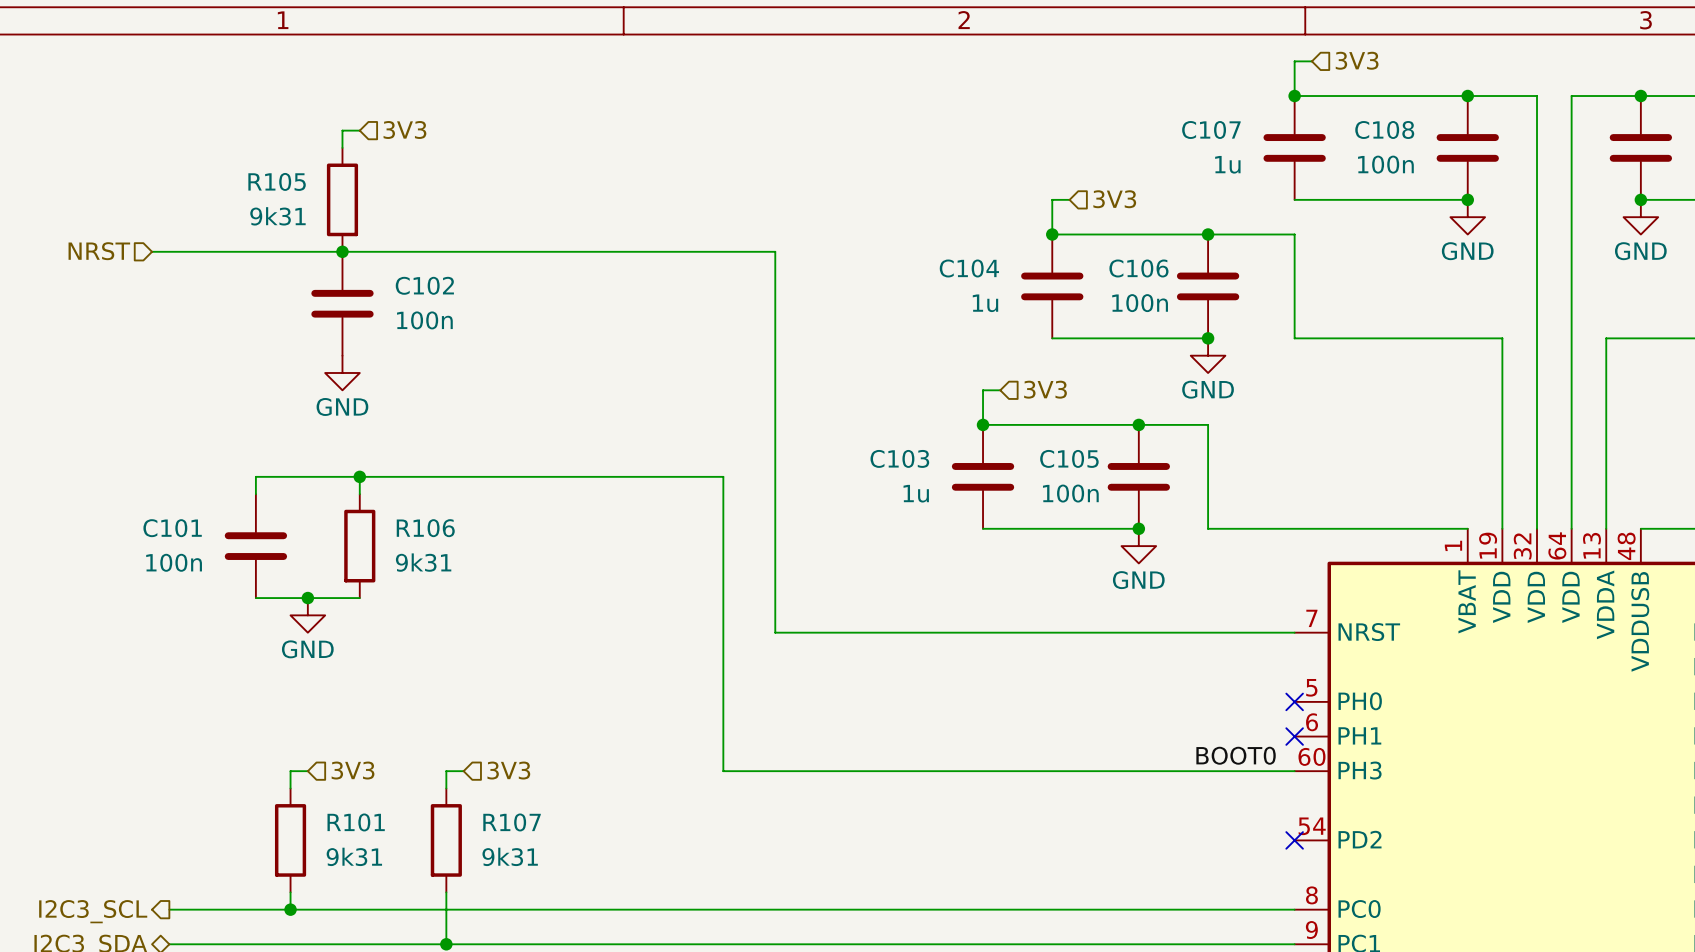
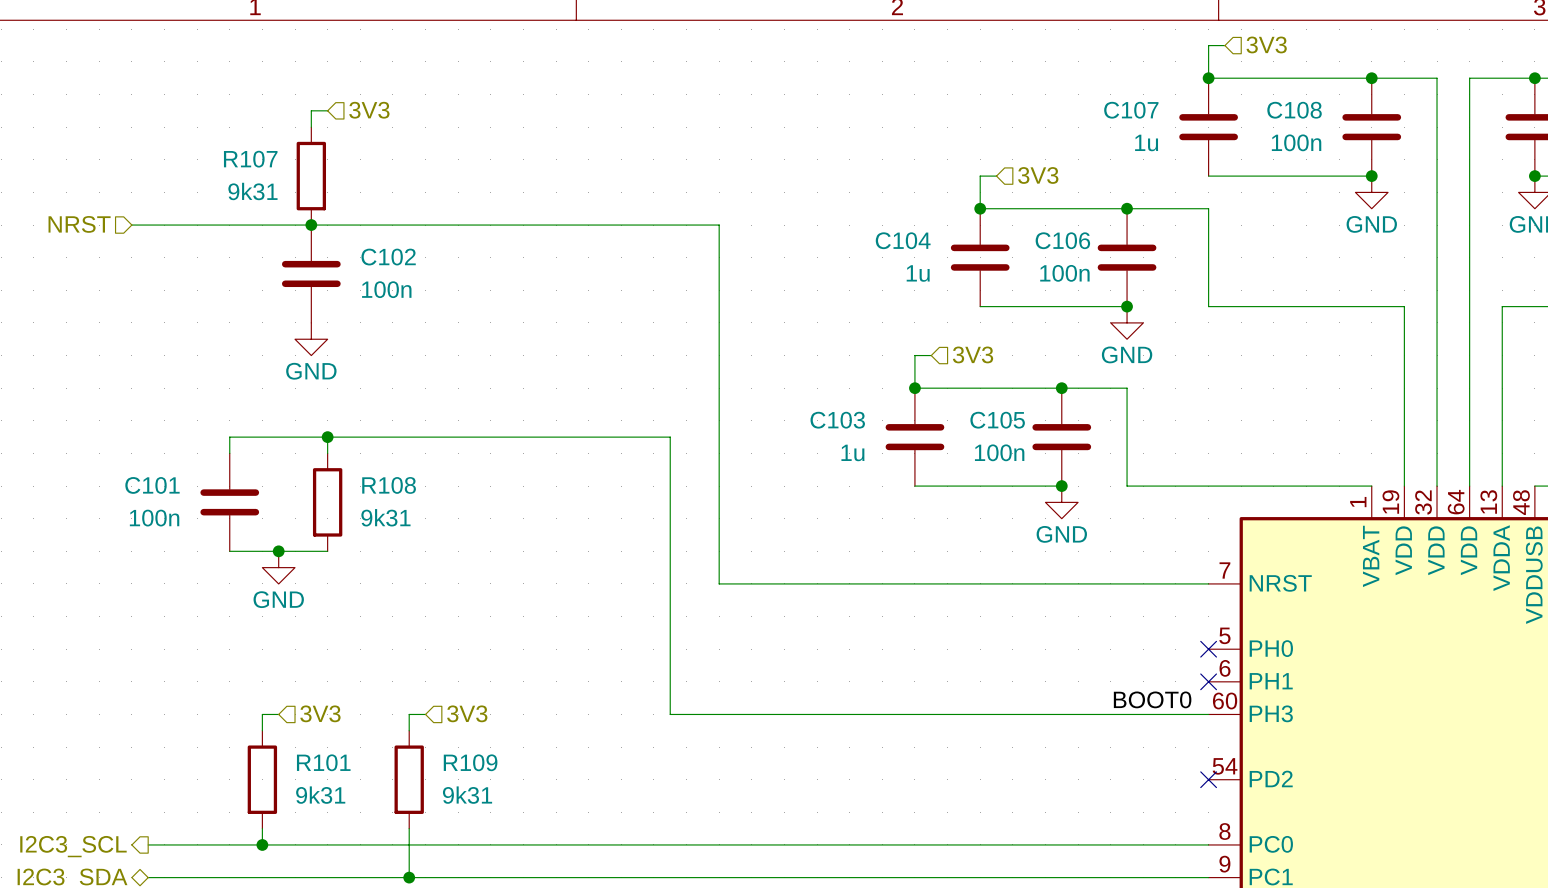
R105 name: R105 (277, 181) -> R107 (250, 159)
R106 name: R106 (425, 528) -> R108 (389, 485)
R107 name: R107 (512, 822) -> R109 (470, 762)

